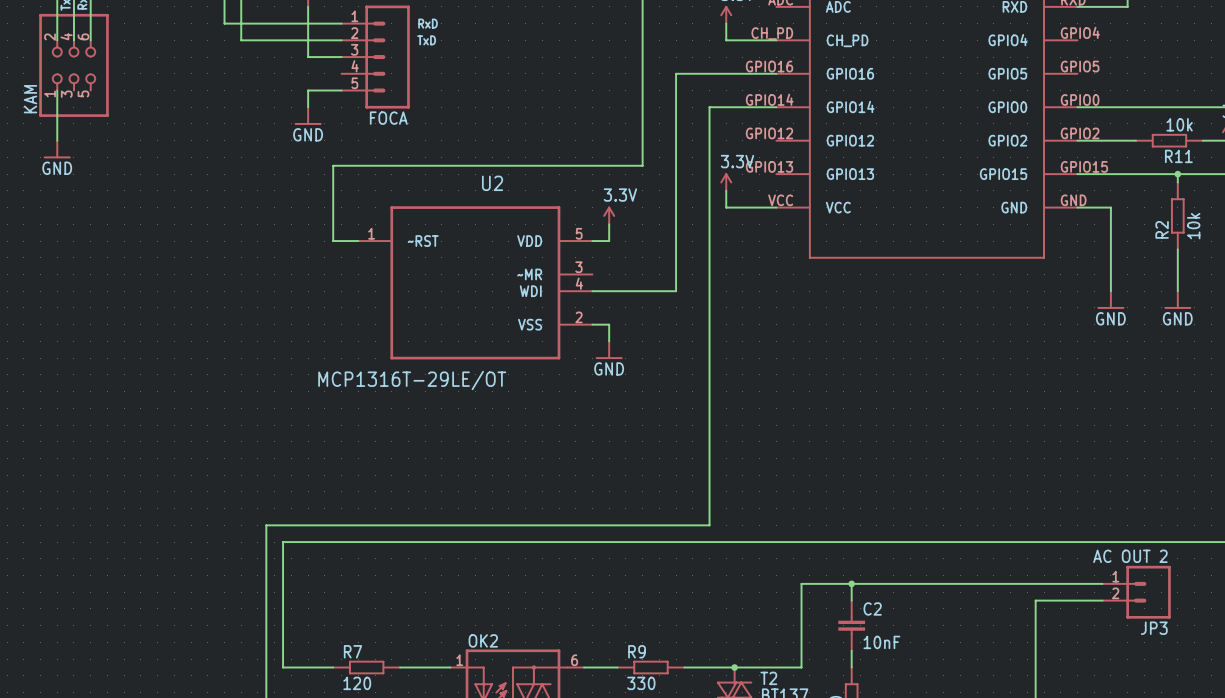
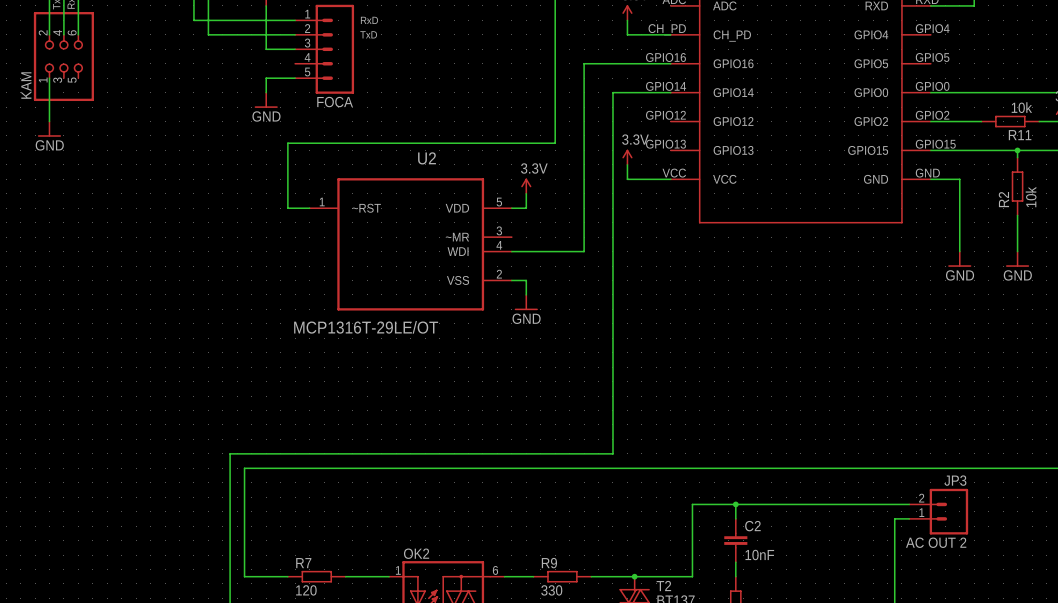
JP3 position: (1136, 592) -> (938, 511)
JP3 flip: as is (1148, 592) -> up-down (948, 511)

